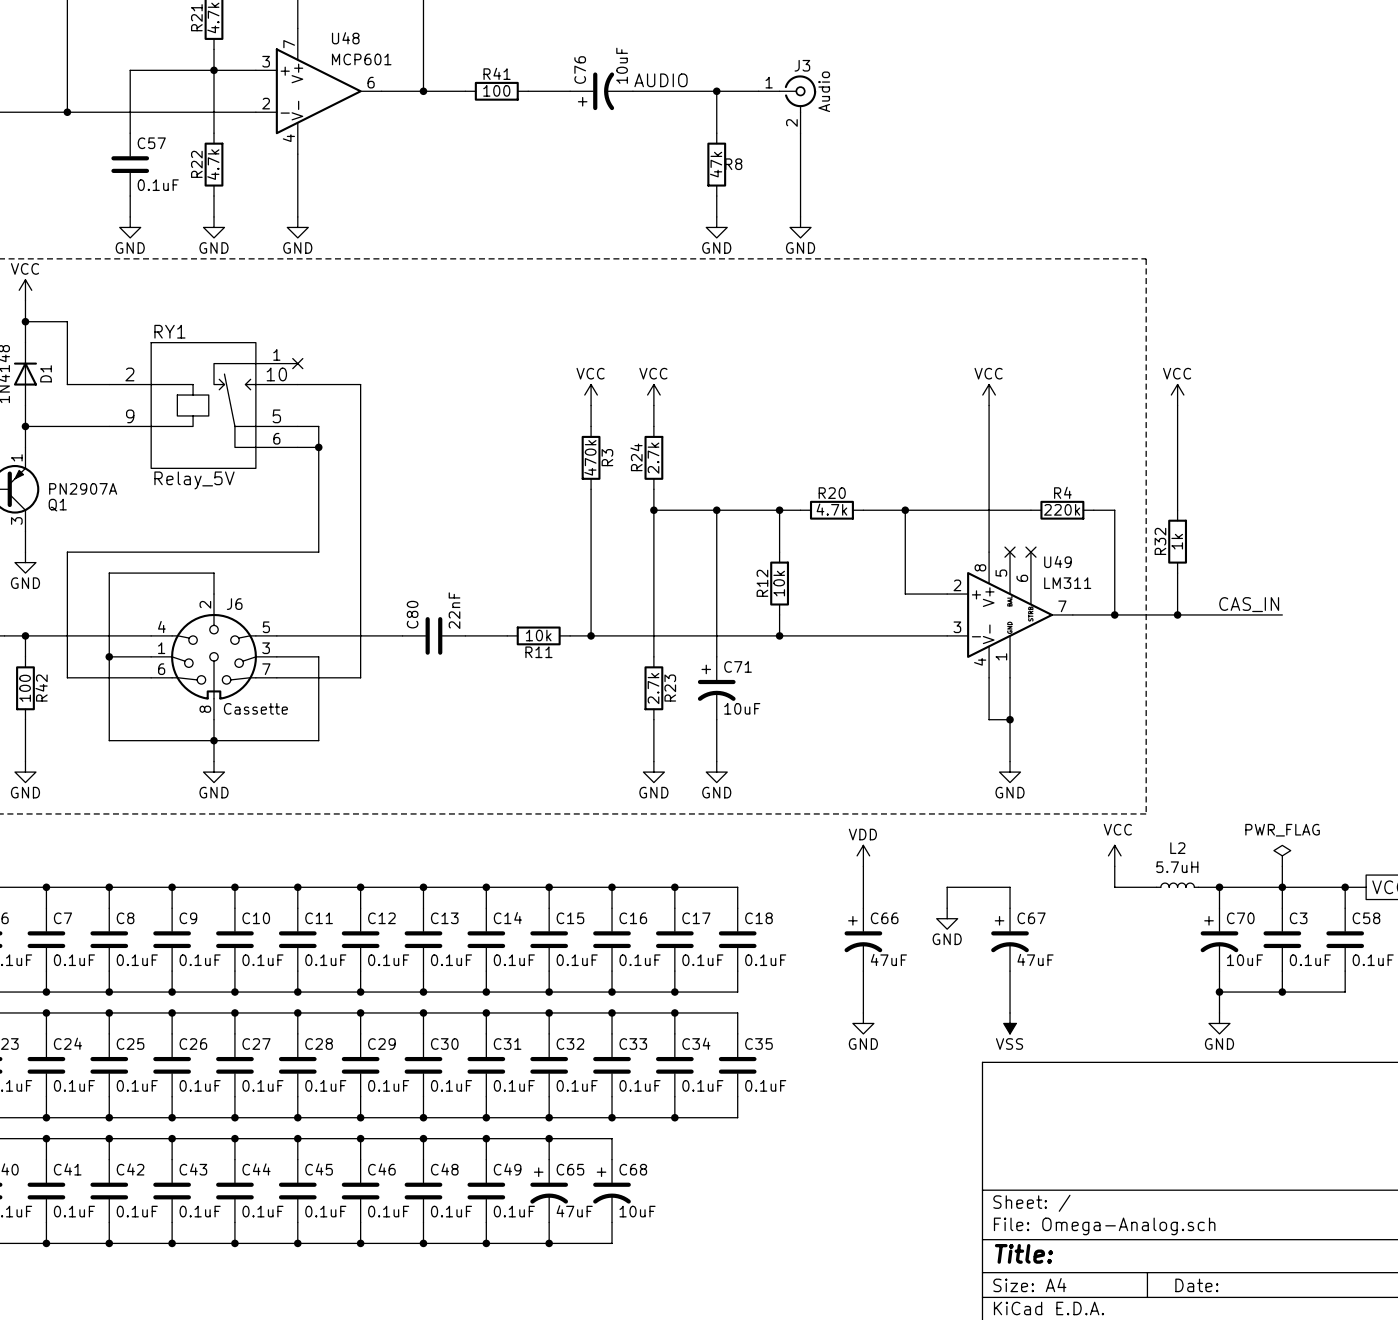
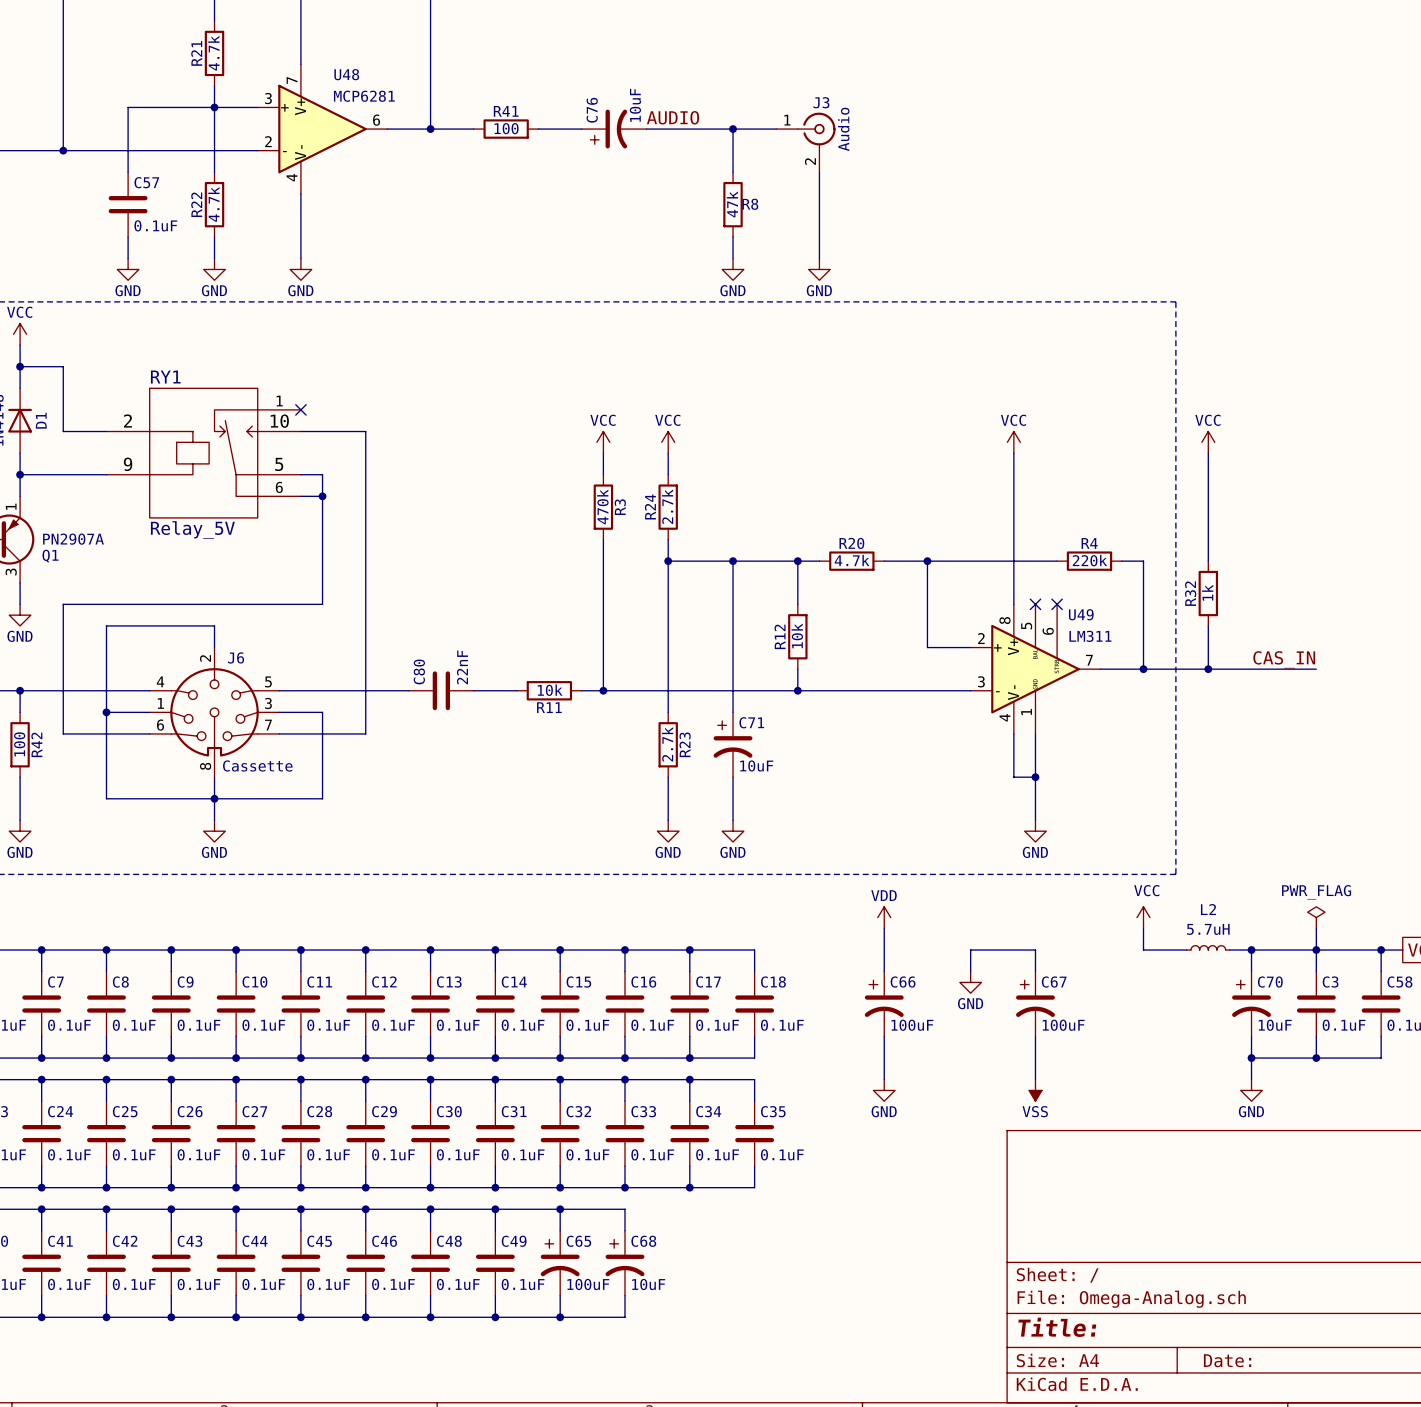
U48 value: MCP601 (361, 59) -> MCP6281 (364, 96)
C66 value: 47uF (888, 959) -> 100uF (912, 1025)
C67 value: 47uF (1035, 959) -> 100uF (1063, 1025)
C65 value: 47uF (574, 1211) -> 100uF (588, 1284)

